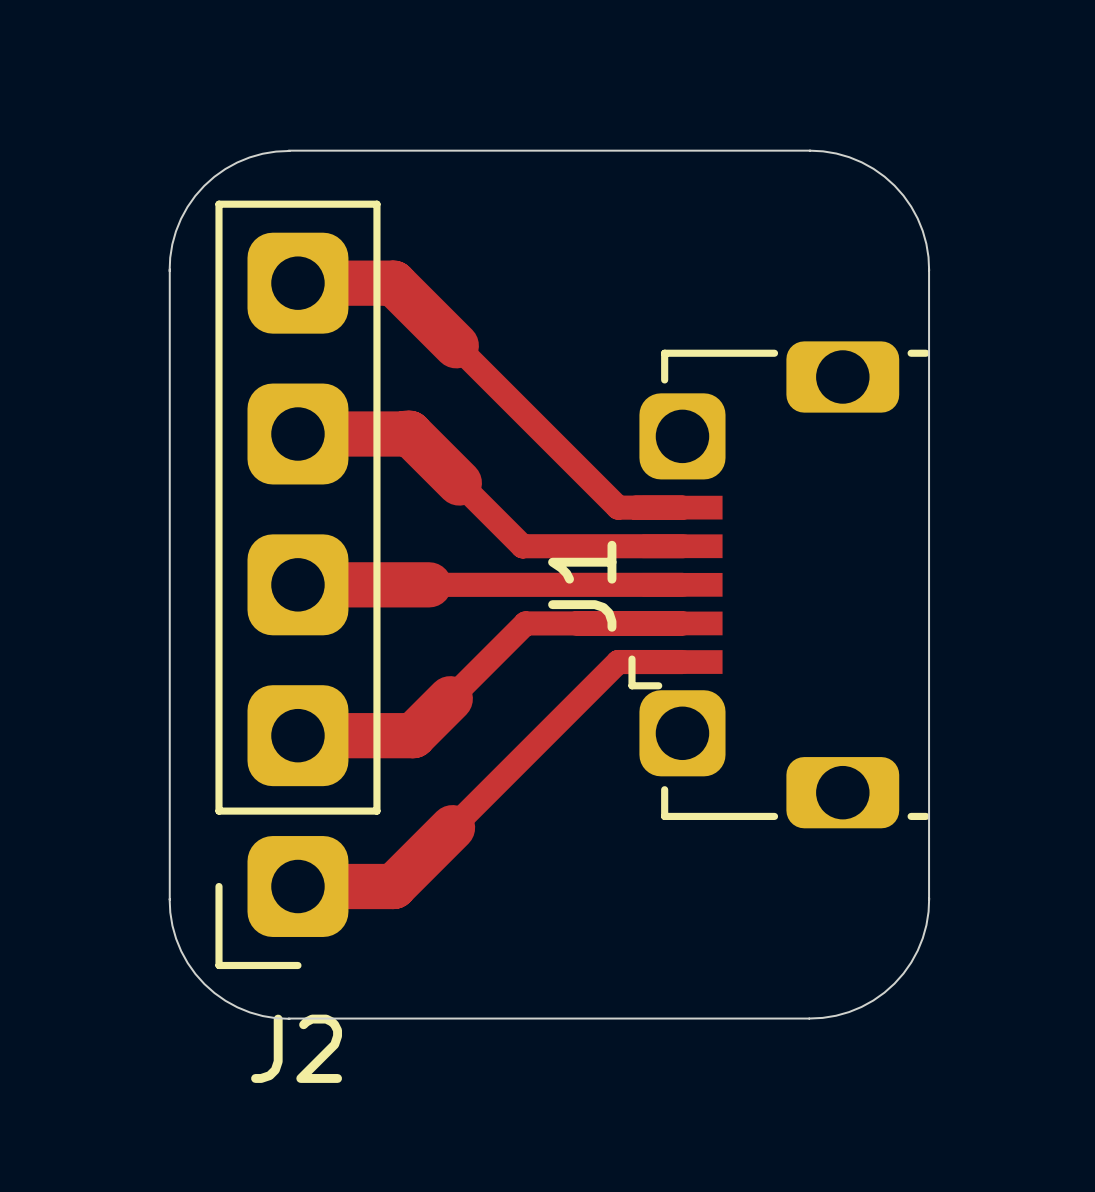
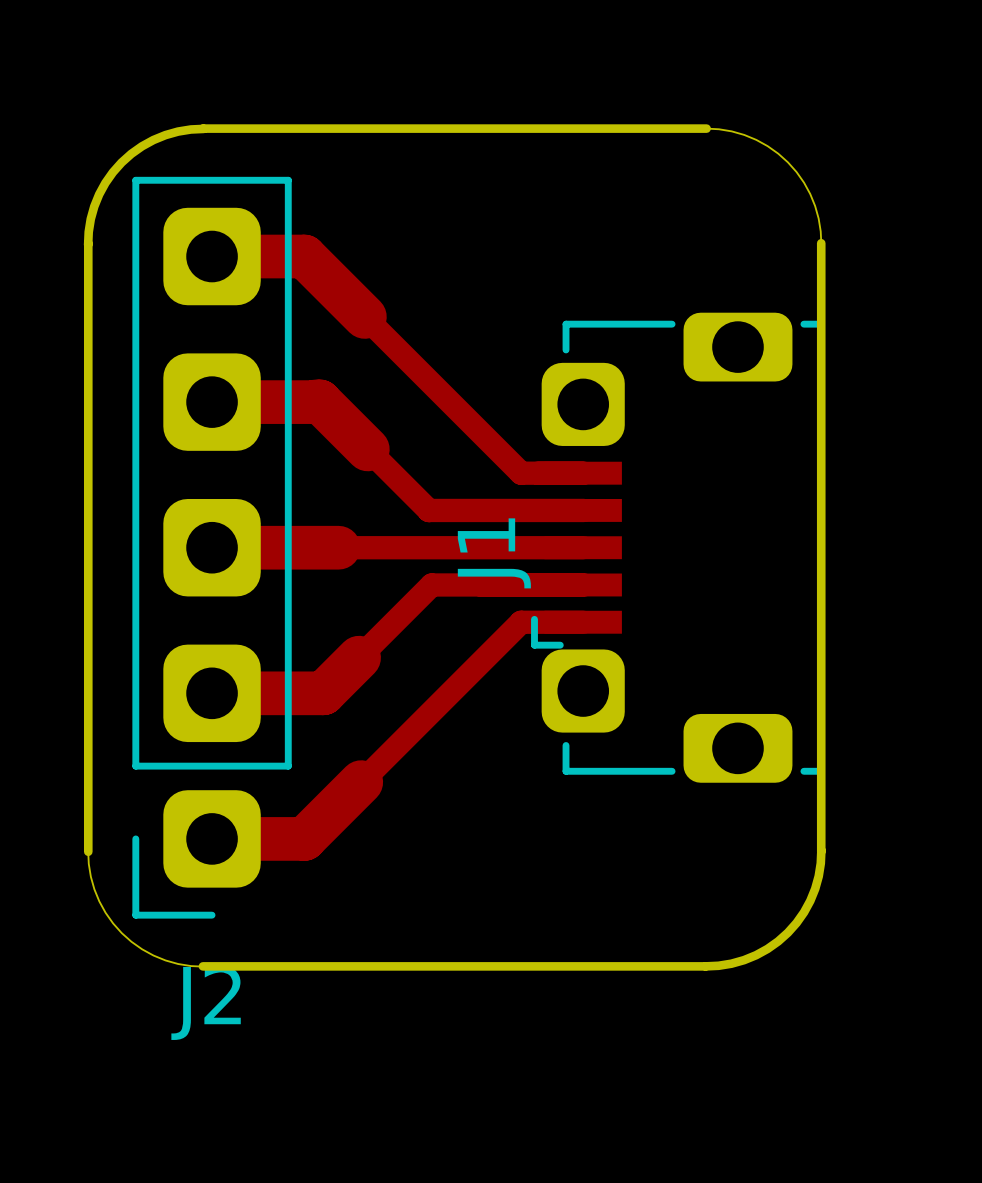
board edge width: thin (288, 150) (810, 150) -> thick (202, 128) (706, 128)
board edge width: thin (289, 150) (262, 153) (237, 162) (225, 169) (204, 185) (187, 206) (181, 218) (172, 244) (169, 271) -> thick (203, 128) (178, 131) (153, 140) (121, 162) (99, 194) (90, 219) (88, 244)
board edge width: thin (169, 269) (169, 899) -> thick (88, 243) (88, 851)
board edge width: thin (929, 269) (929, 899) -> thick (821, 243) (821, 851)
board edge width: thin (929, 898) (926, 925) (922, 938) (911, 962) (903, 973) (894, 983) (873, 1000) (861, 1006) (836, 1015) (809, 1018) (288, 1018) -> thick (821, 850) (815, 888) (796, 922) (767, 948) (731, 963) (705, 966) (202, 966)

